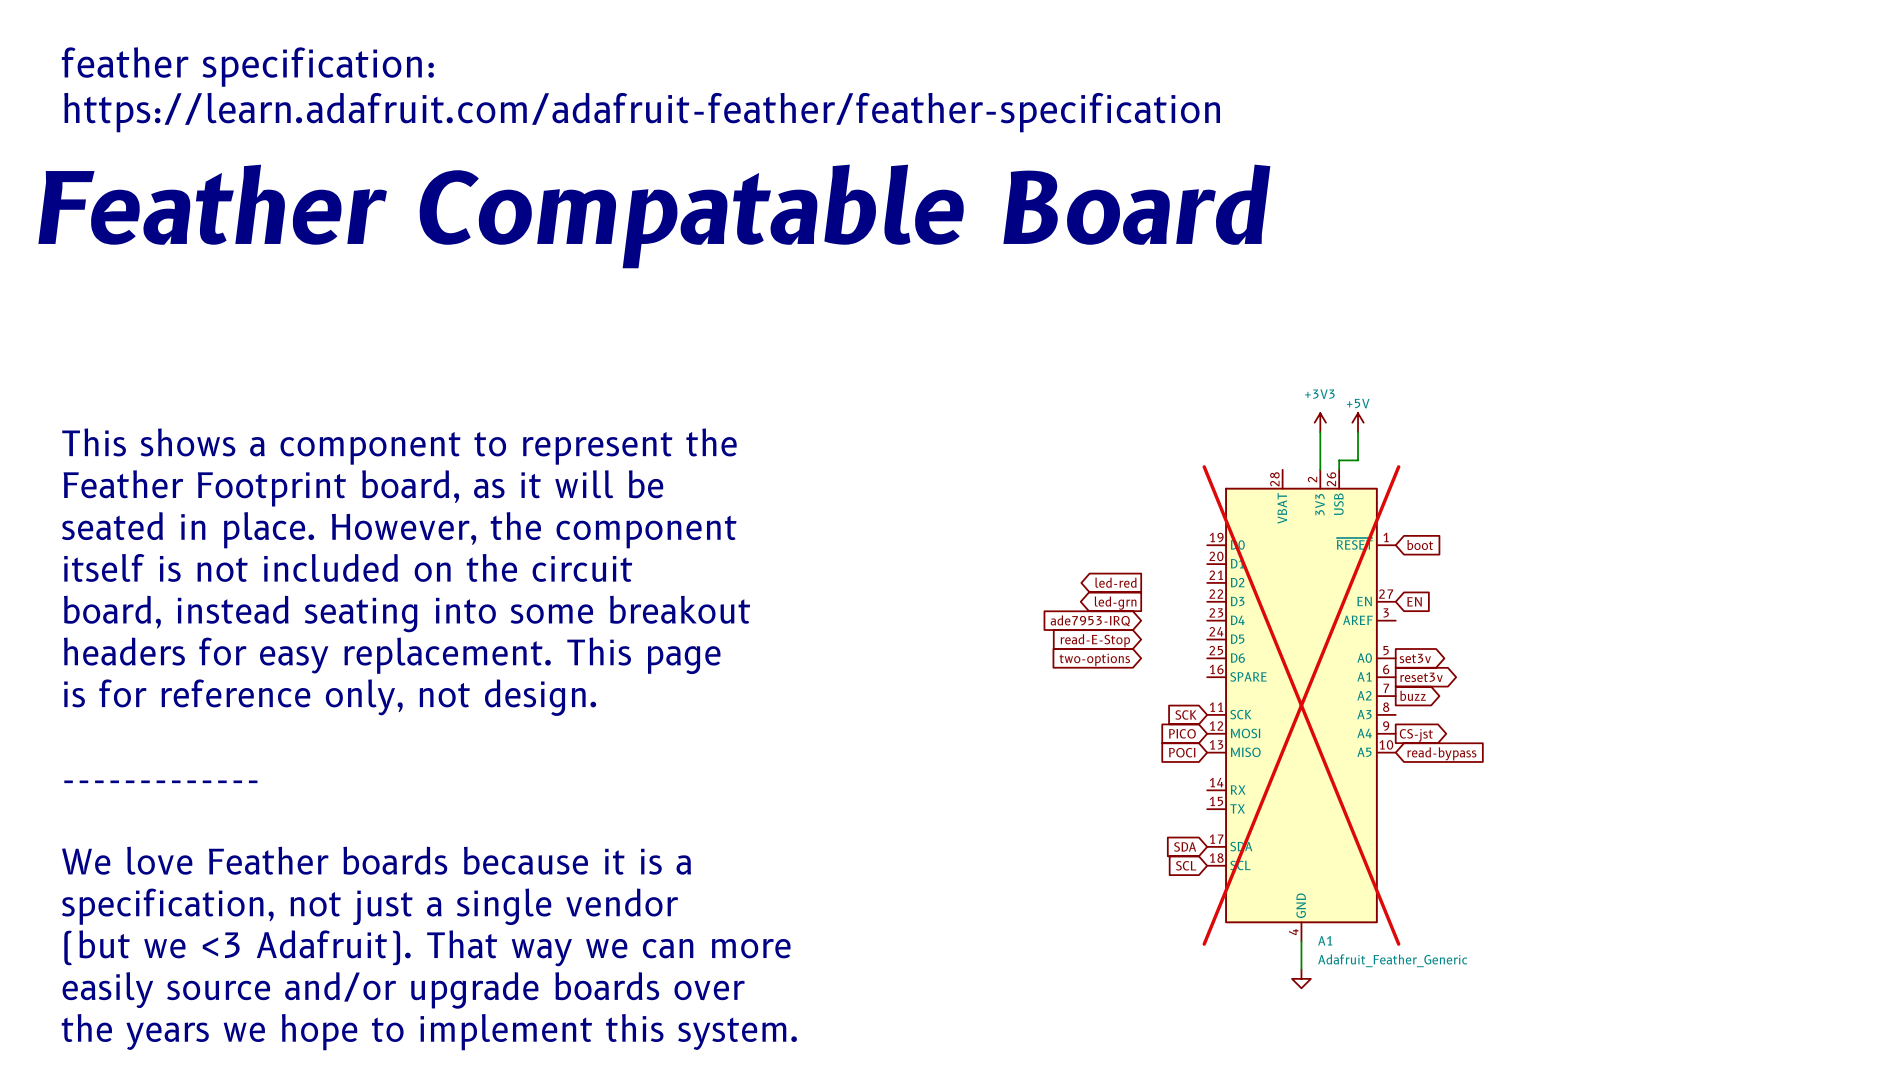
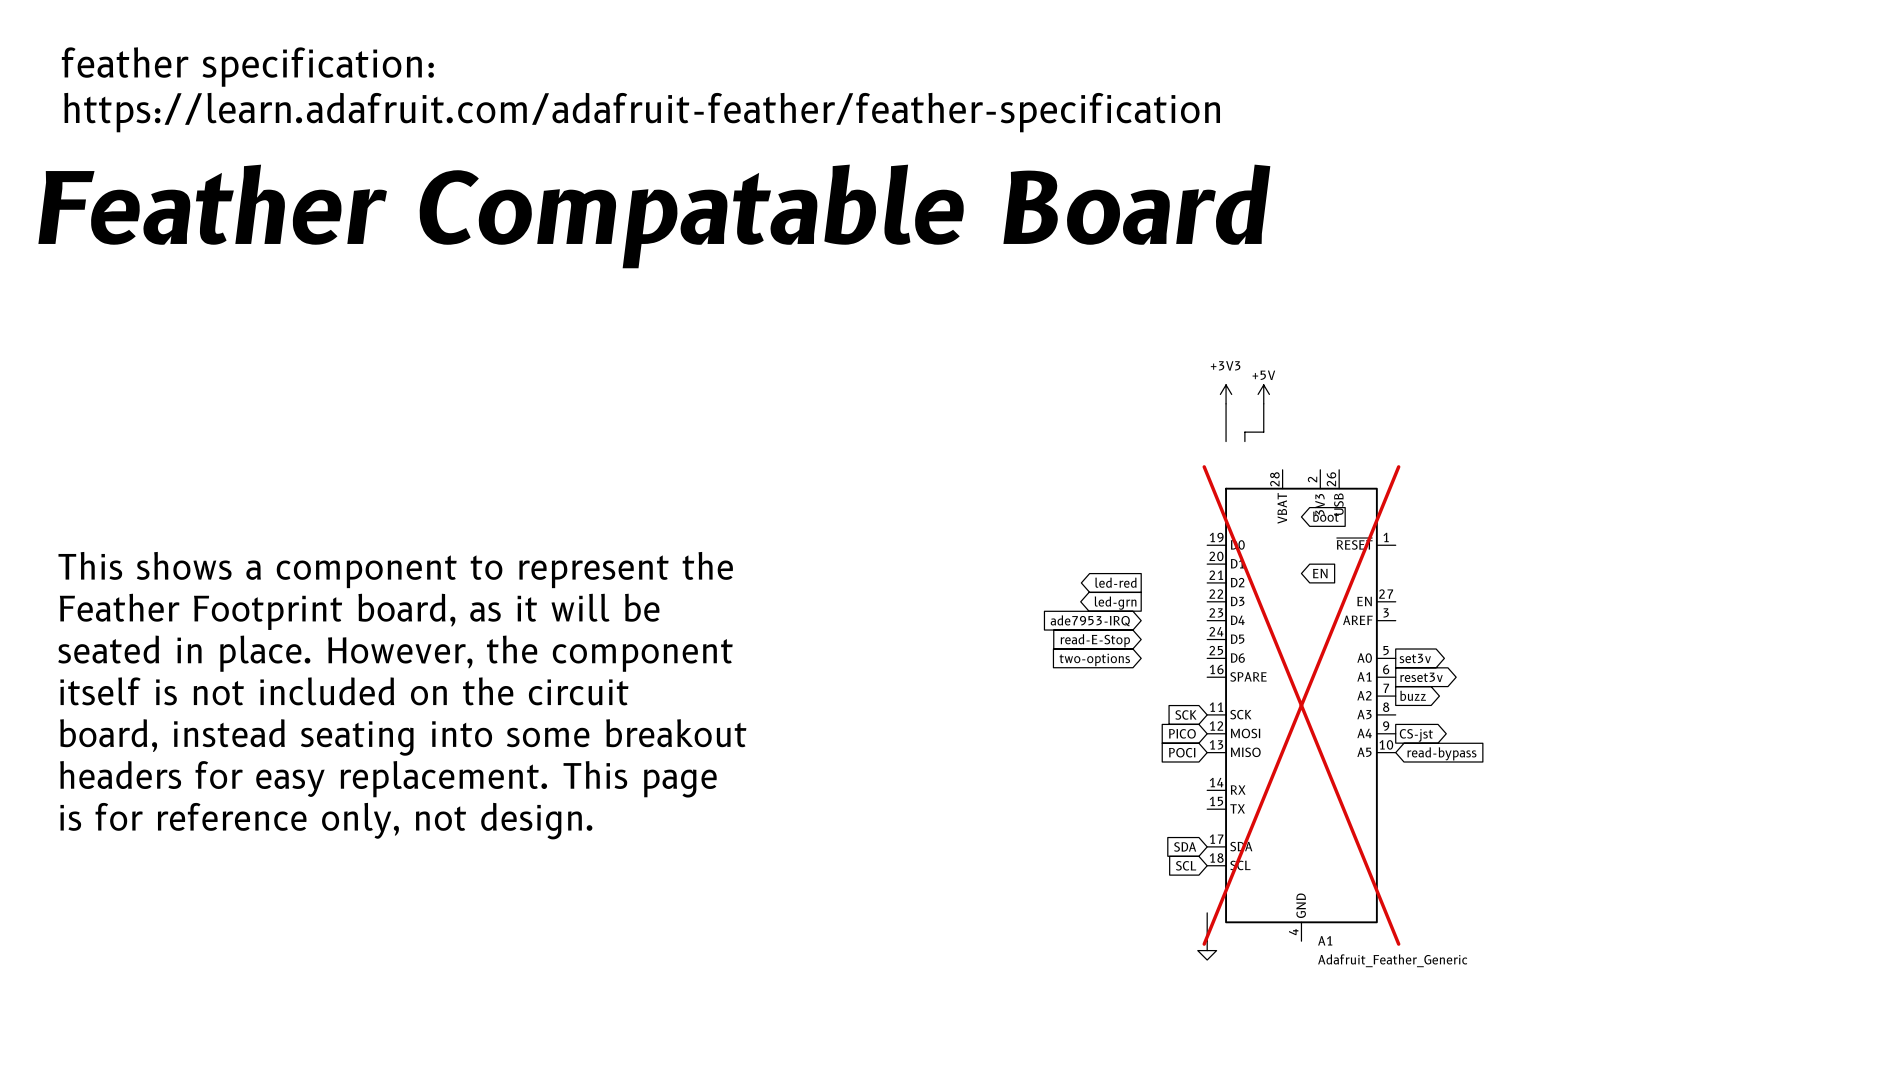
power symbol position: +3V3 (1320, 422) -> +3V3 (1226, 394)
power symbol position: +5V (1358, 422) -> +5V (1263, 394)
wire: (1320, 432) (1320, 469) -> (1226, 403) (1226, 441)
wire: (1358, 432) (1358, 460) (1339, 460) (1339, 469) -> (1263, 403) (1263, 432) (1244, 432) (1244, 441)
text position: This shows a component to represent the (399, 446) -> This shows a component to represent the (395, 570)
text position: Feather Footprint board, as it will be (363, 488) -> Feather Footprint board, as it will be (359, 611)
text position: seated in place. However, the component (399, 530) -> seated in place. However, the component (395, 653)
global label position: boot (1420, 544) -> boot (1326, 516)
text position: itself is not included on the circuit (348, 567) -> itself is not included on the circuit (344, 691)
global label position: EN (1414, 601) -> EN (1320, 573)
text position: board, instead seating into some breakout (407, 614) -> board, instead seating into some breakout (403, 737)
text position: headers for easy replacement. This page (392, 655) -> headers for easy replacement. This page (388, 779)
text position: is for reference only, not design. (330, 697) -> is for reference only, not design. (326, 821)
text: ------------- (160, 781) -> none
text: We love Feather boards because it is a (376, 860) -> none
text: specification, not just a single vendor (369, 906) -> none
wire: (1301, 941) (1301, 969) -> (1207, 912) (1207, 941)
text: (but we <3 Adafruit). That way we can more (427, 948) -> none
power symbol position: (1301, 978) -> (1207, 950)
text: easily source and/or upgrade boards over (403, 990) -> none
text: the years we hope to implement this system. (429, 1032) -> none

